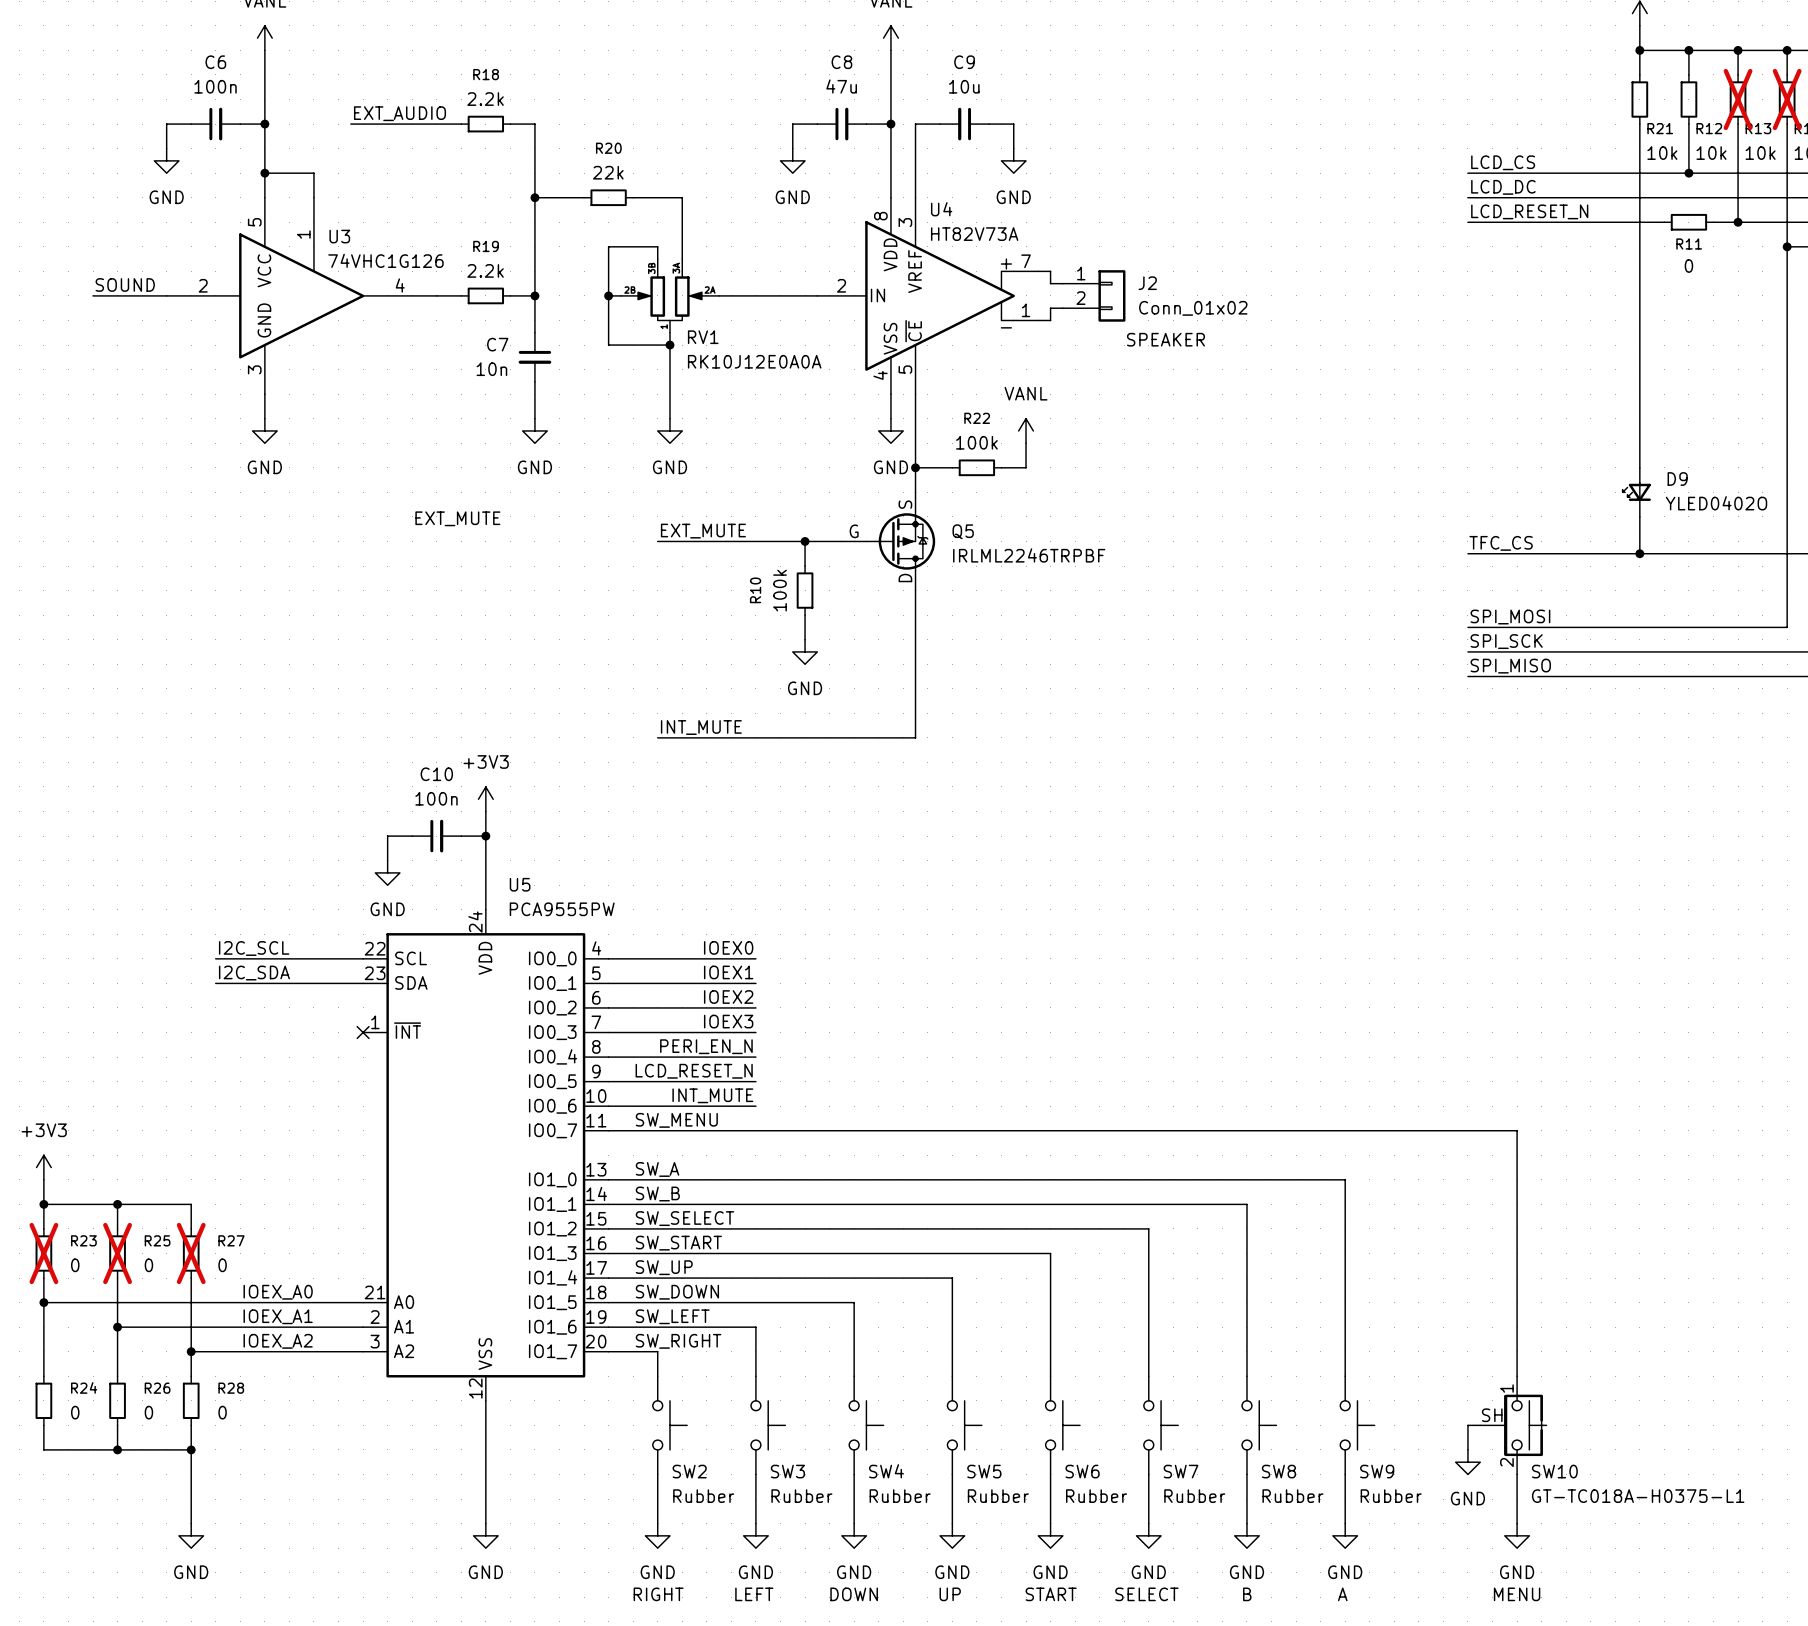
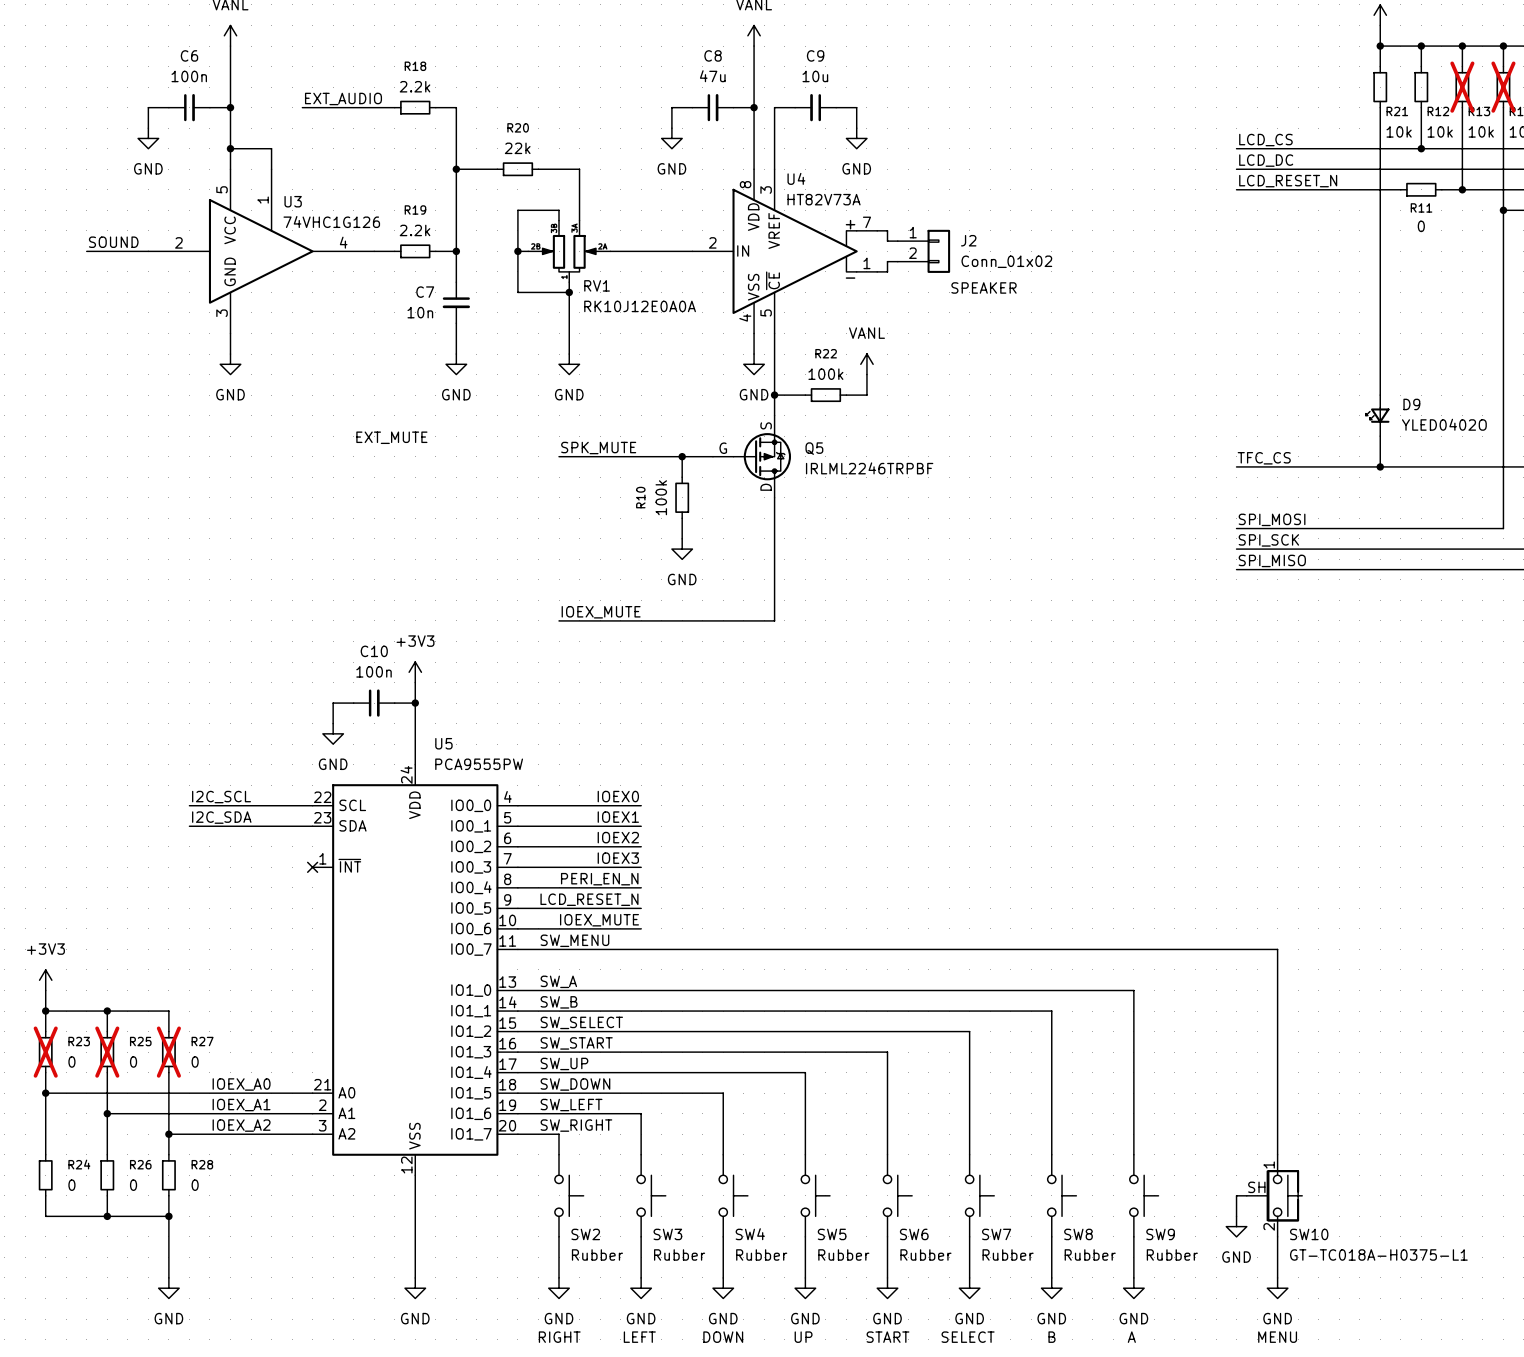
label: EXT_MUTE (703, 531) -> SPK_MUTE (598, 448)
label: INT_MUTE (701, 727) -> IOEX_MUTE (601, 612)
label: INT_MUTE (712, 1095) -> IOEX_MUTE (599, 920)

